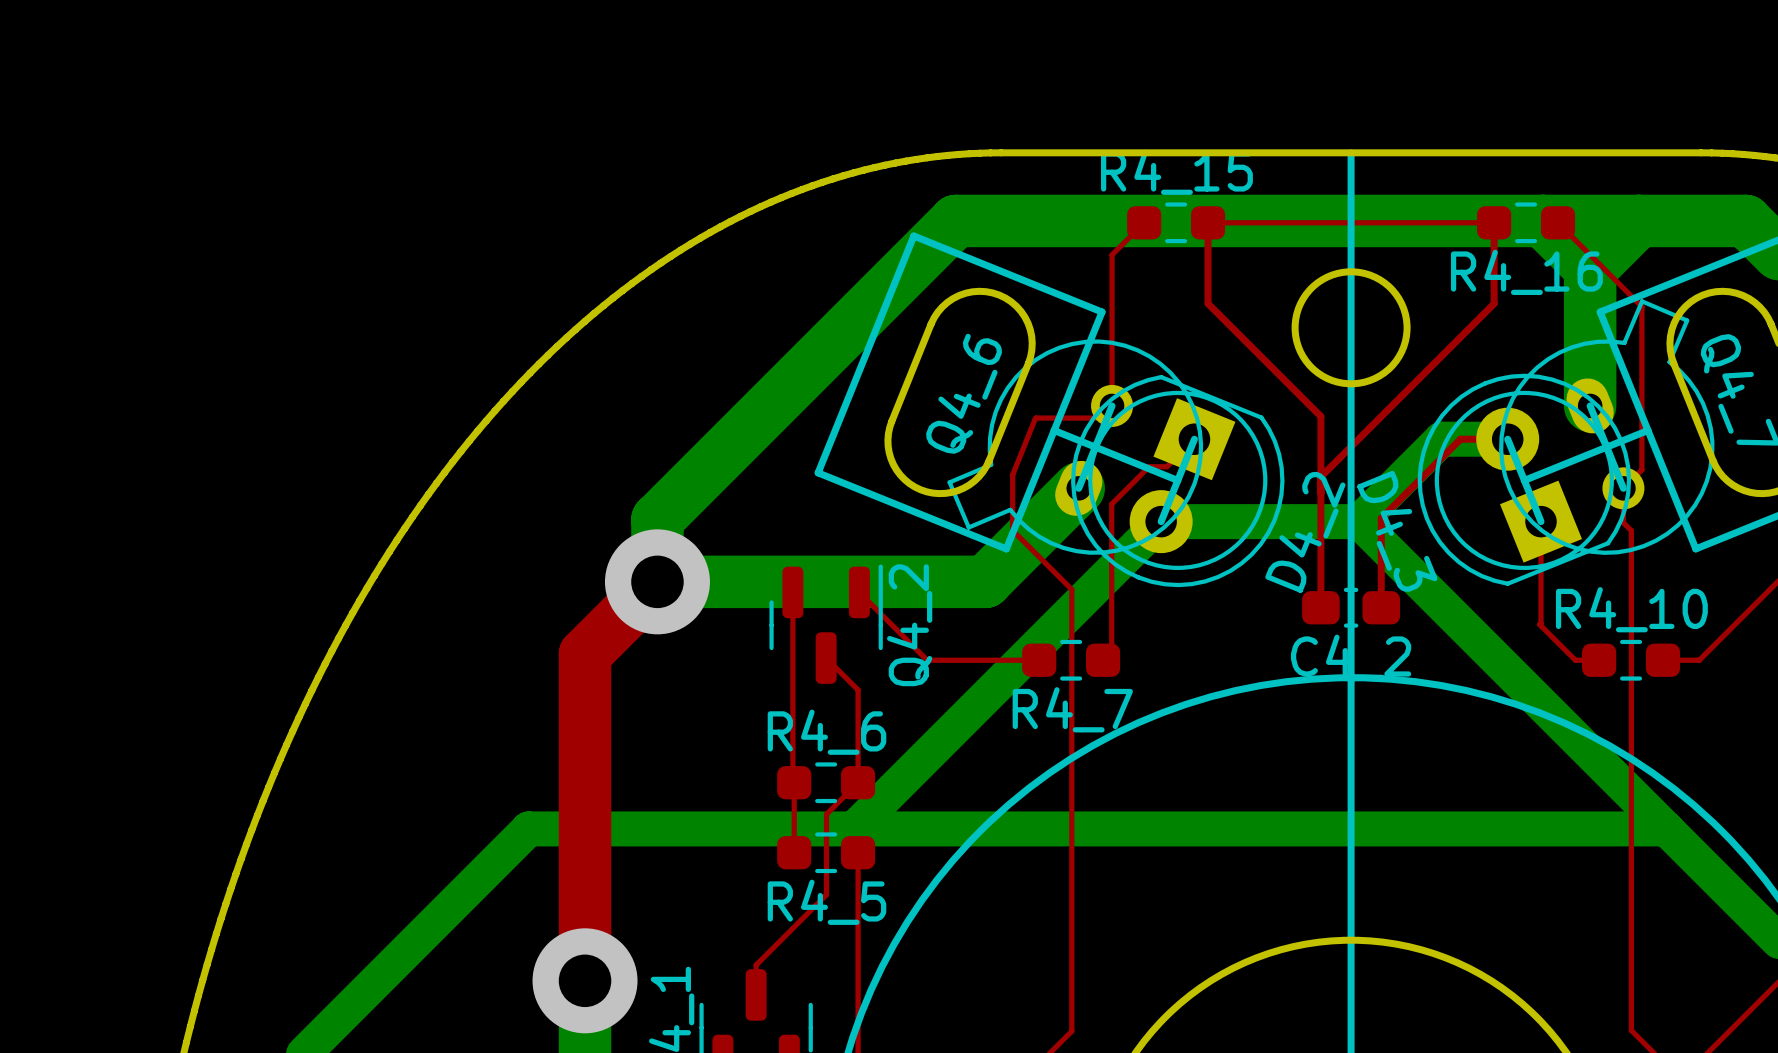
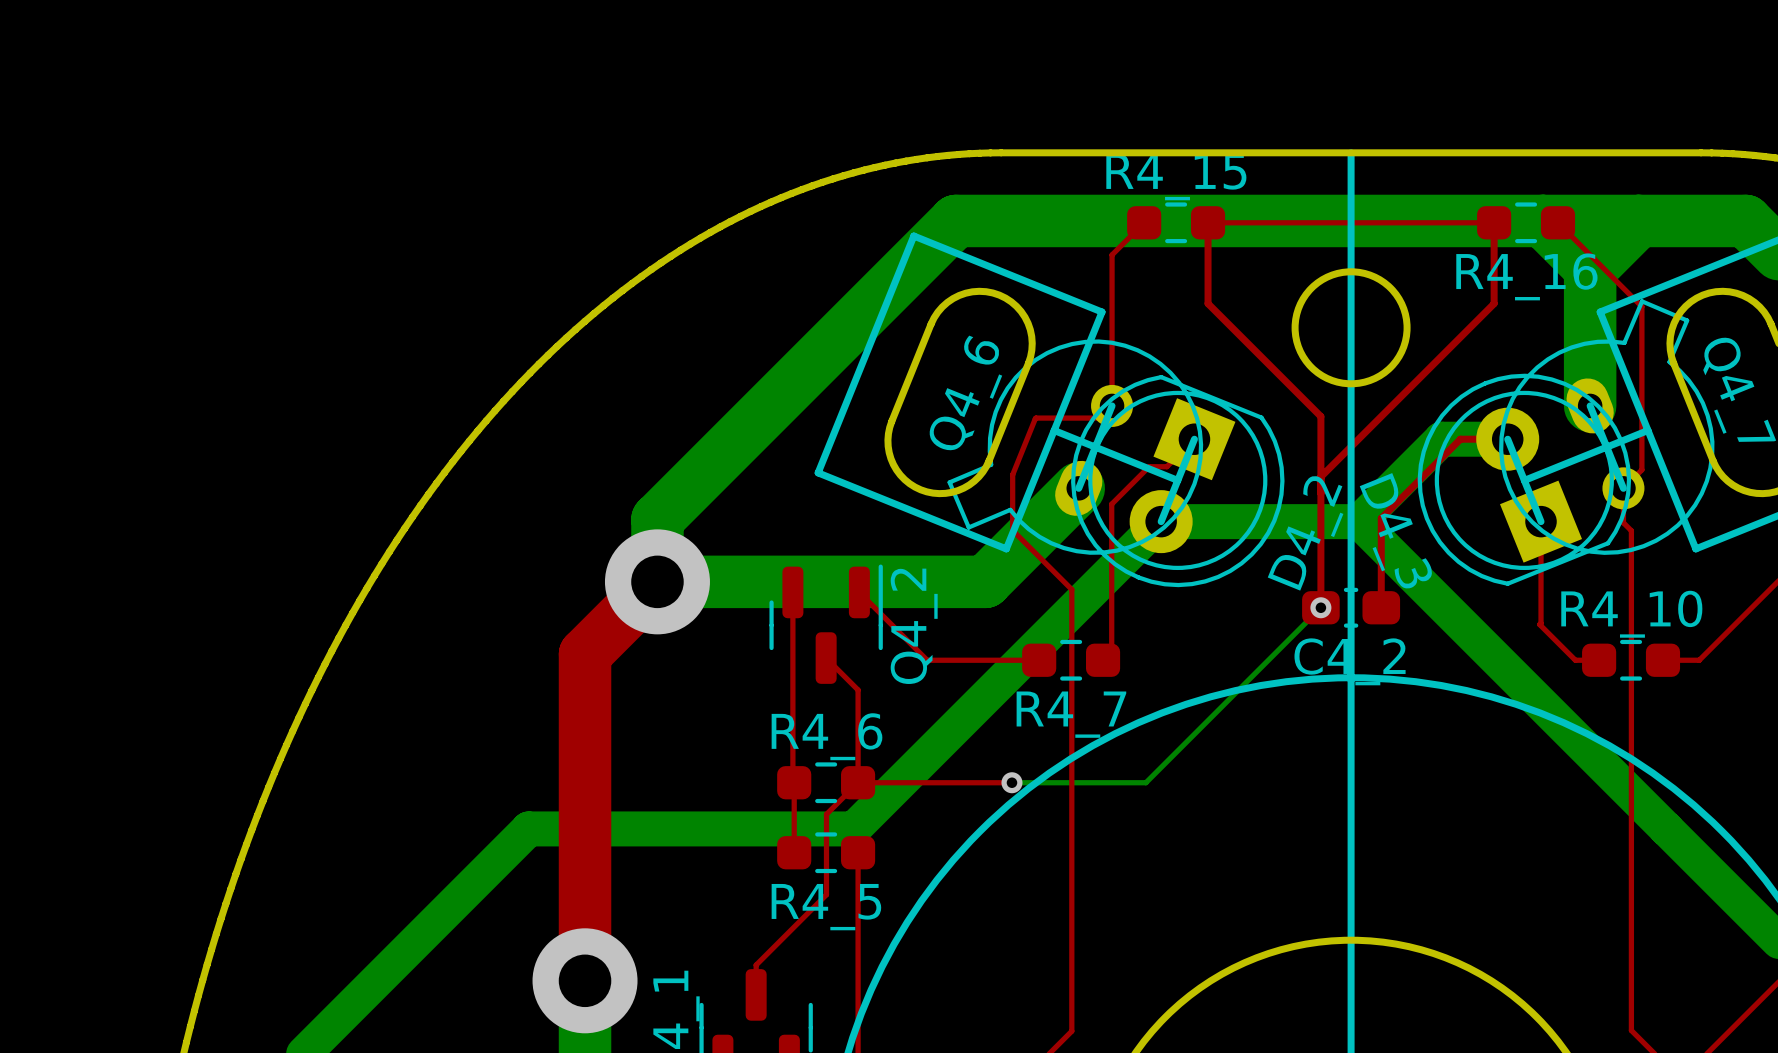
bottom track: none -> (1320, 607) (1145, 782) (1011, 782)
via: none -> (1320, 607)
top track: none -> (858, 782) (1011, 782)
via: none -> (1011, 782)
bottom track: (853, 828) (1666, 828) -> none

